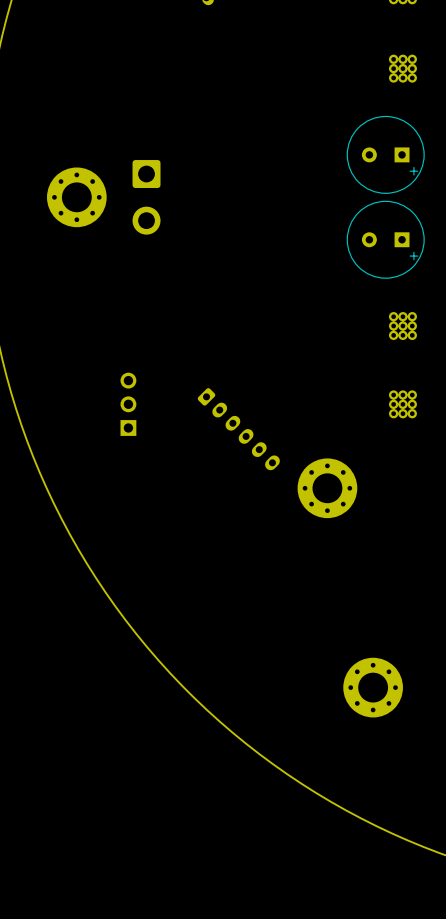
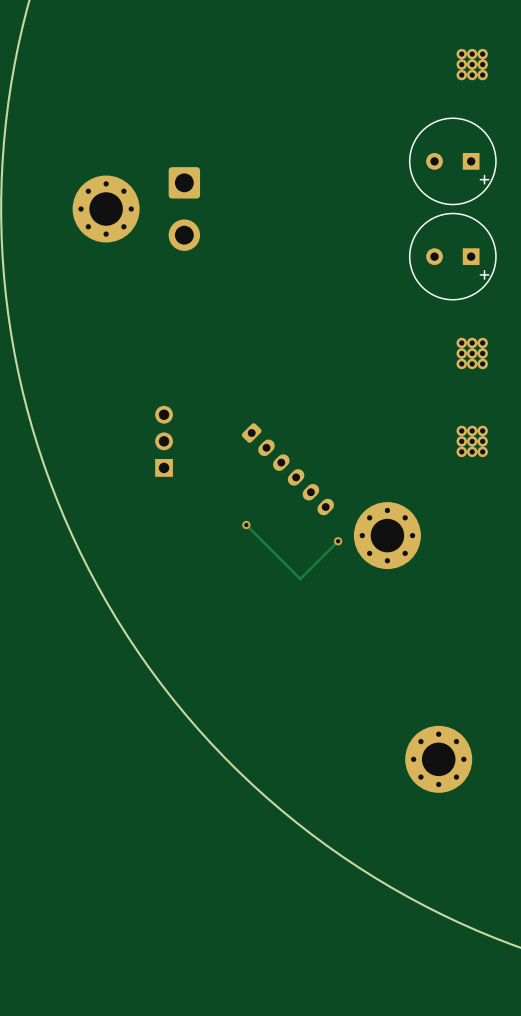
track: none -> (246, 525) (300, 579) (338, 541)
via: none -> (246, 525)
via: none -> (338, 541)

